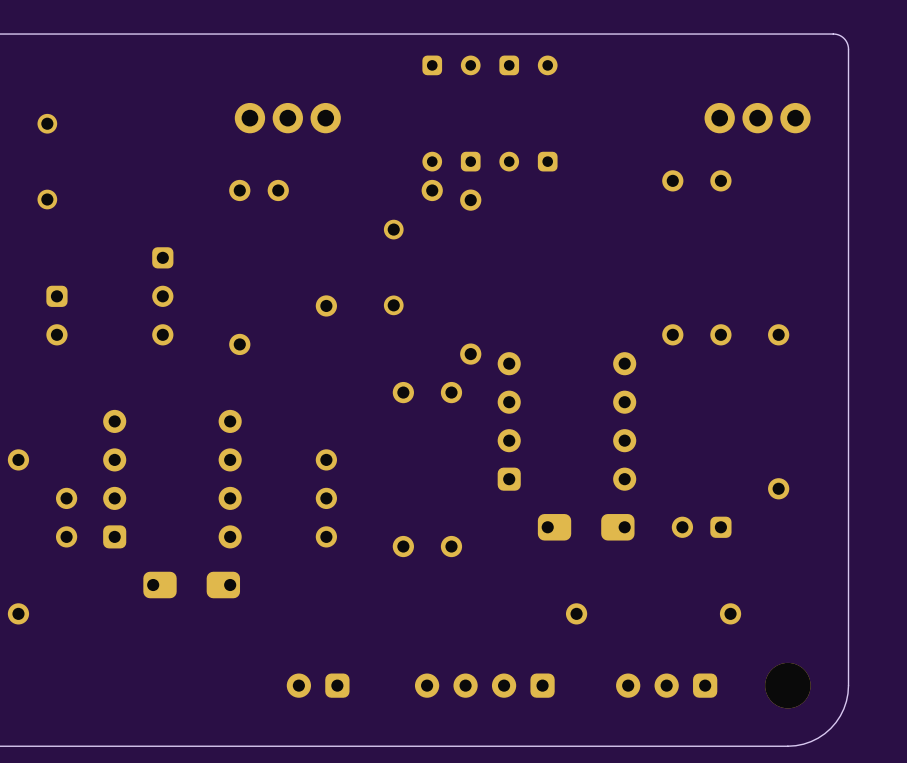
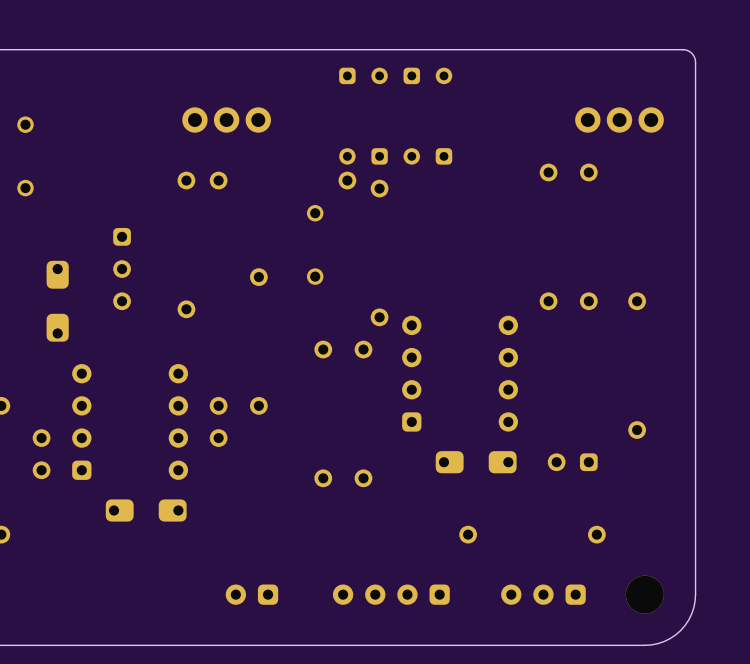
part: (56, 315) -> none
part: none -> (57, 301)
part position: (326, 517) -> (218, 421)

